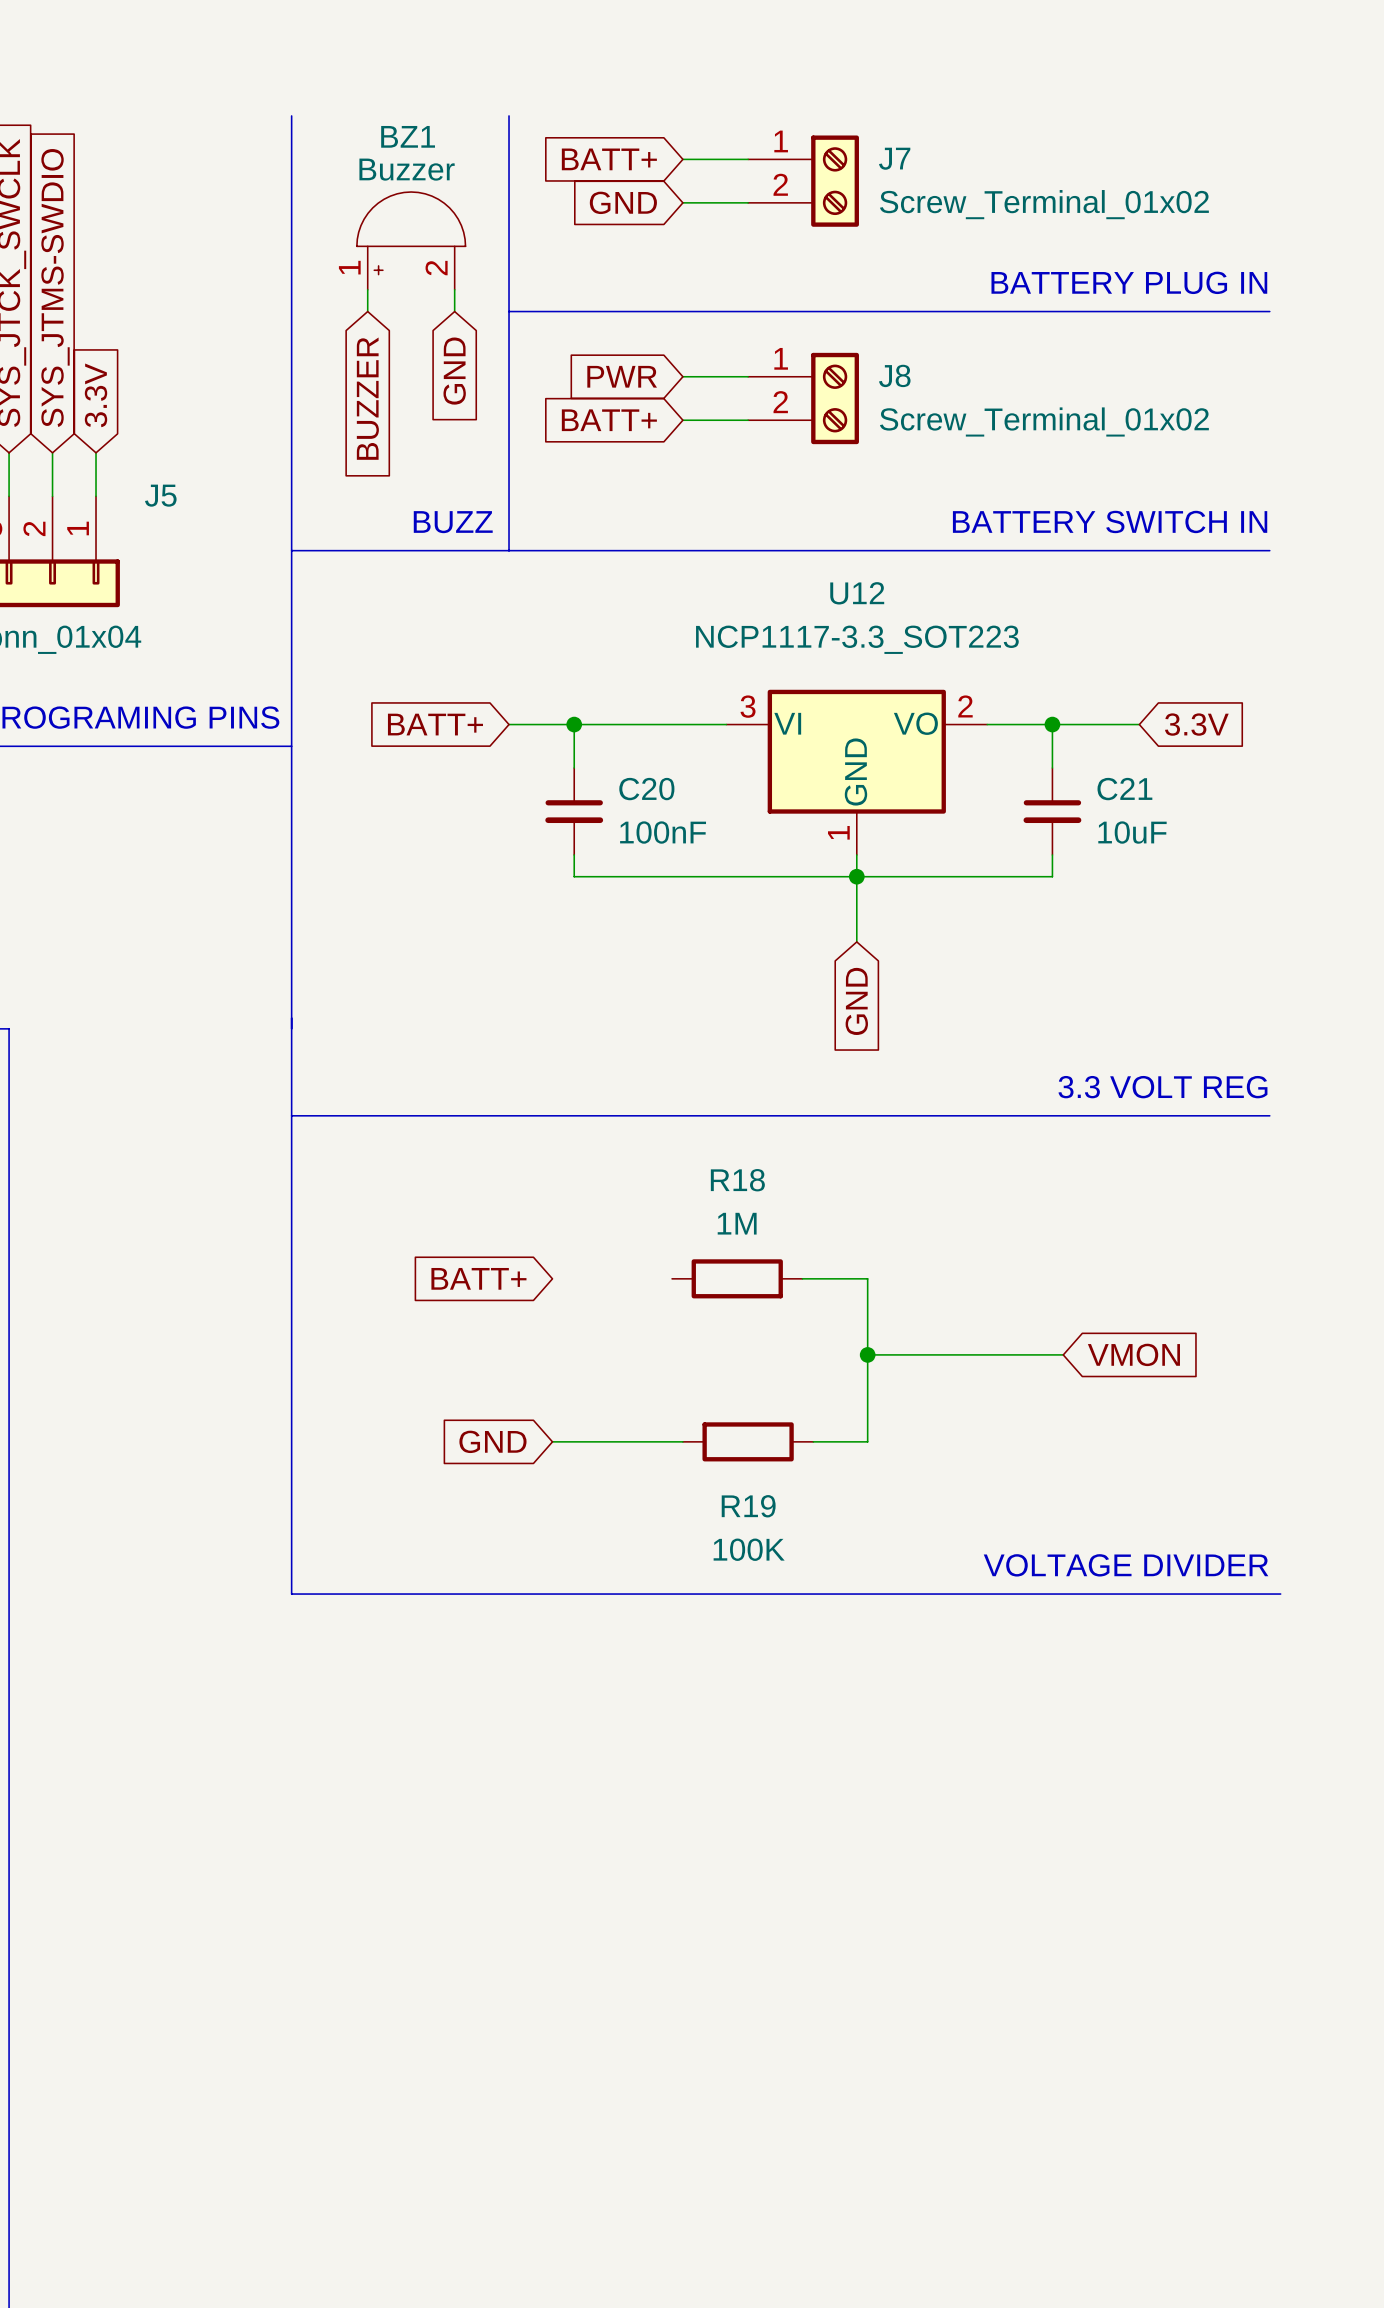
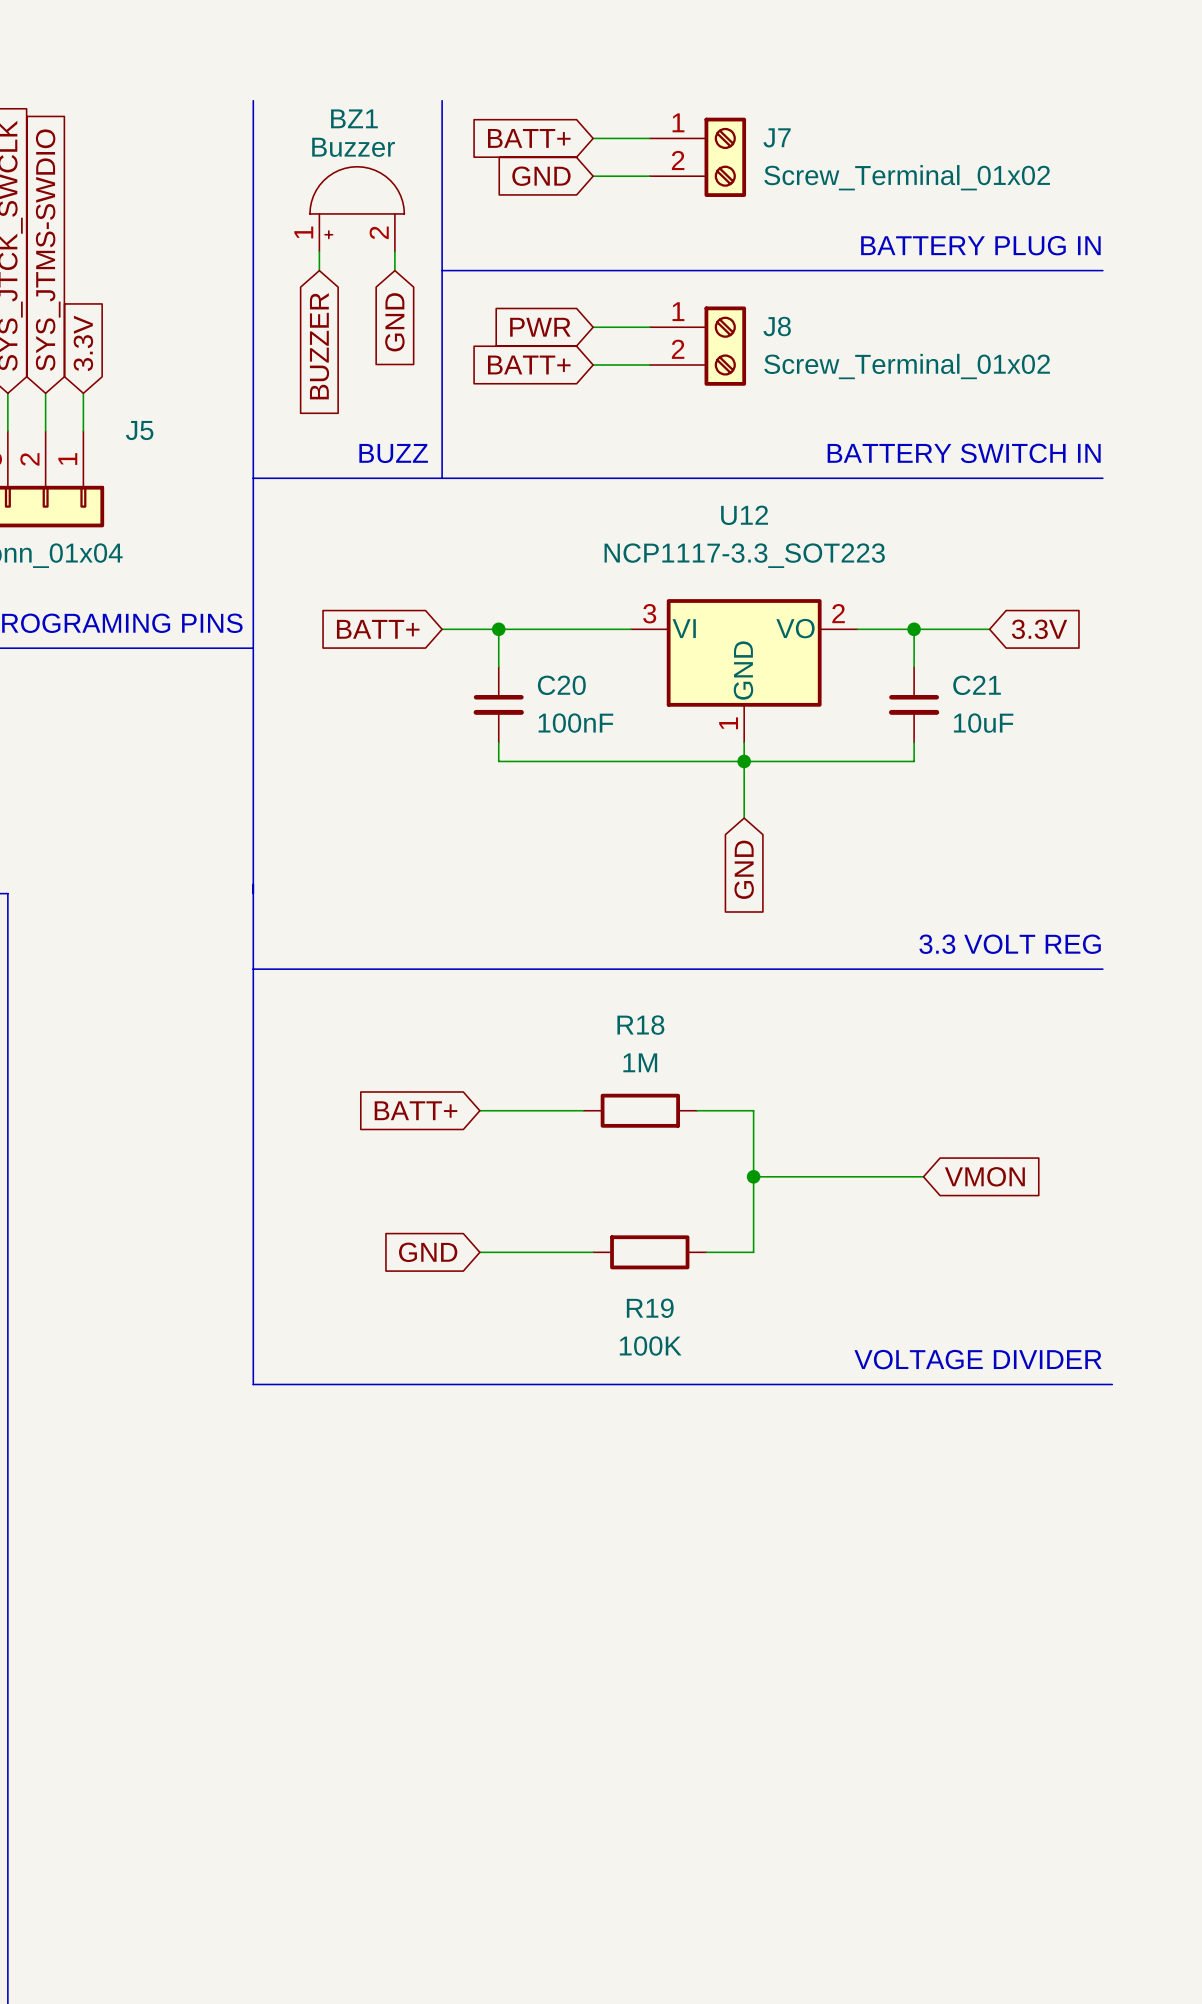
wire: none -> (479, 1110) (583, 1110)

